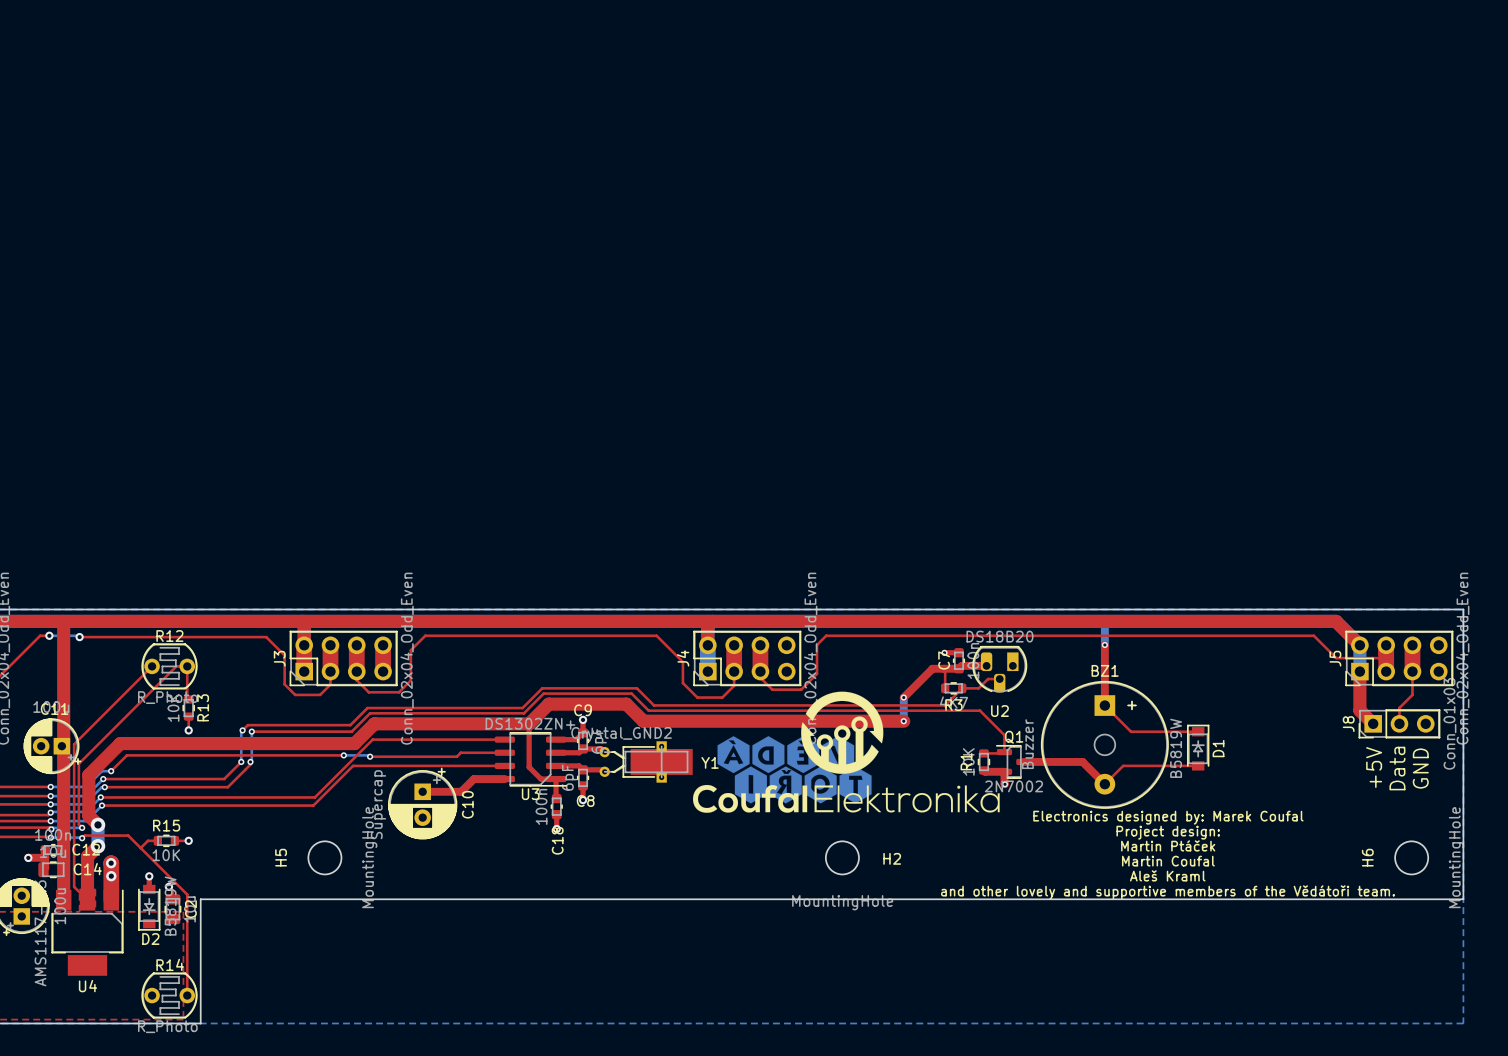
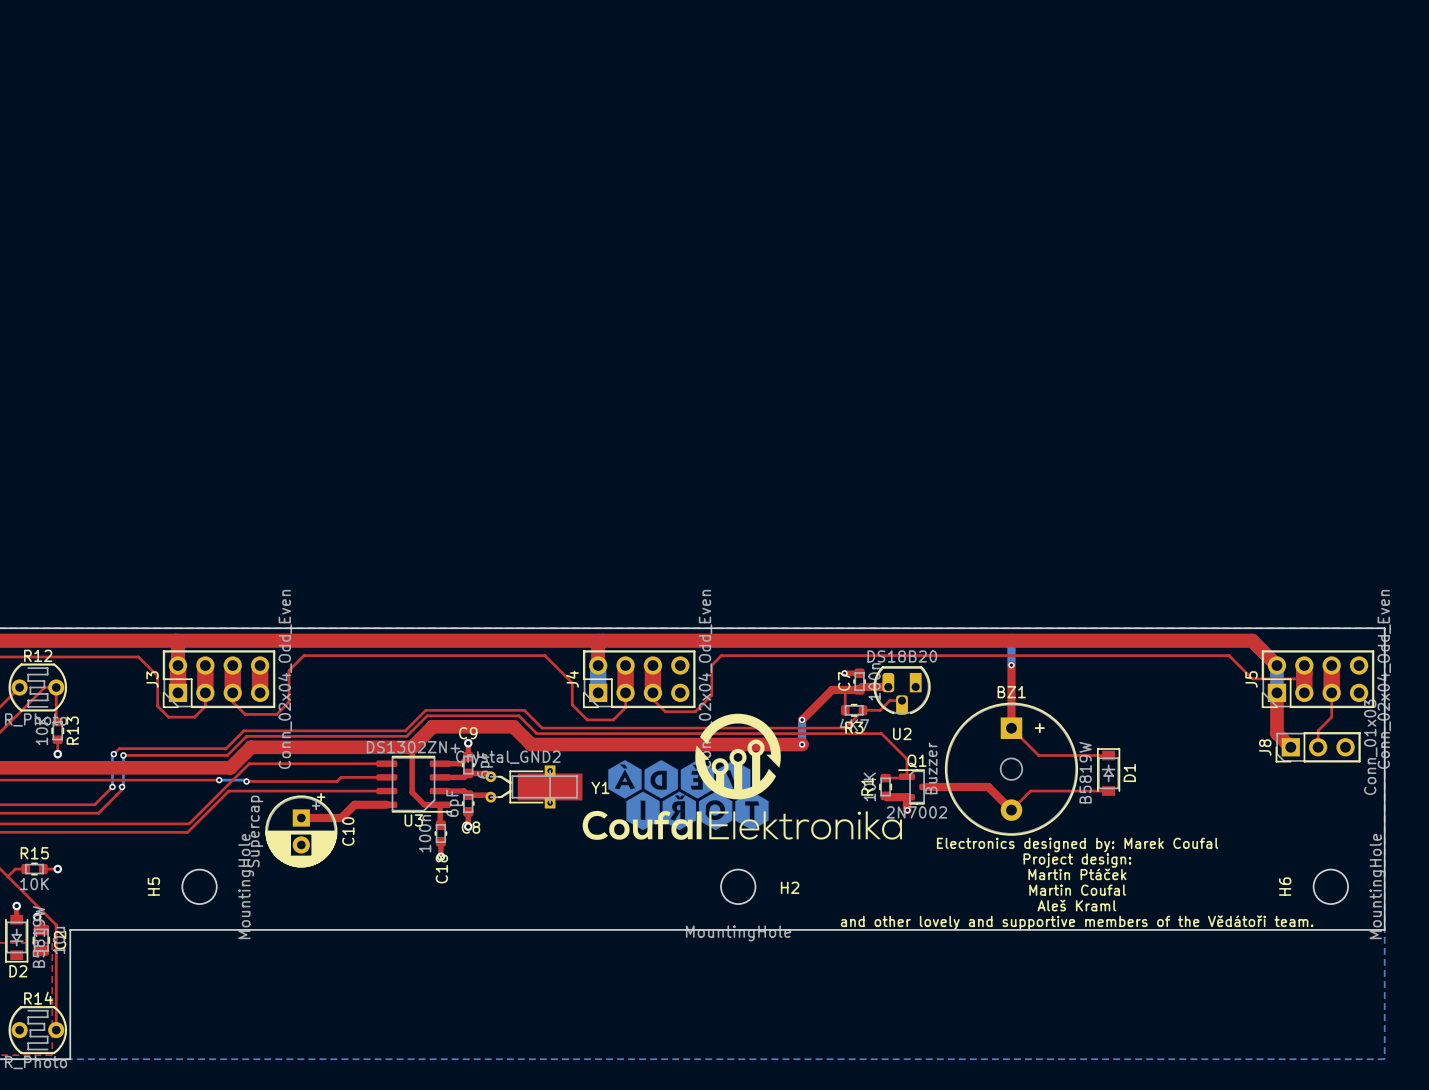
text: +5V (1374, 767) -> none
text: Data (1397, 768) -> none
text: GND (1420, 768) -> none

